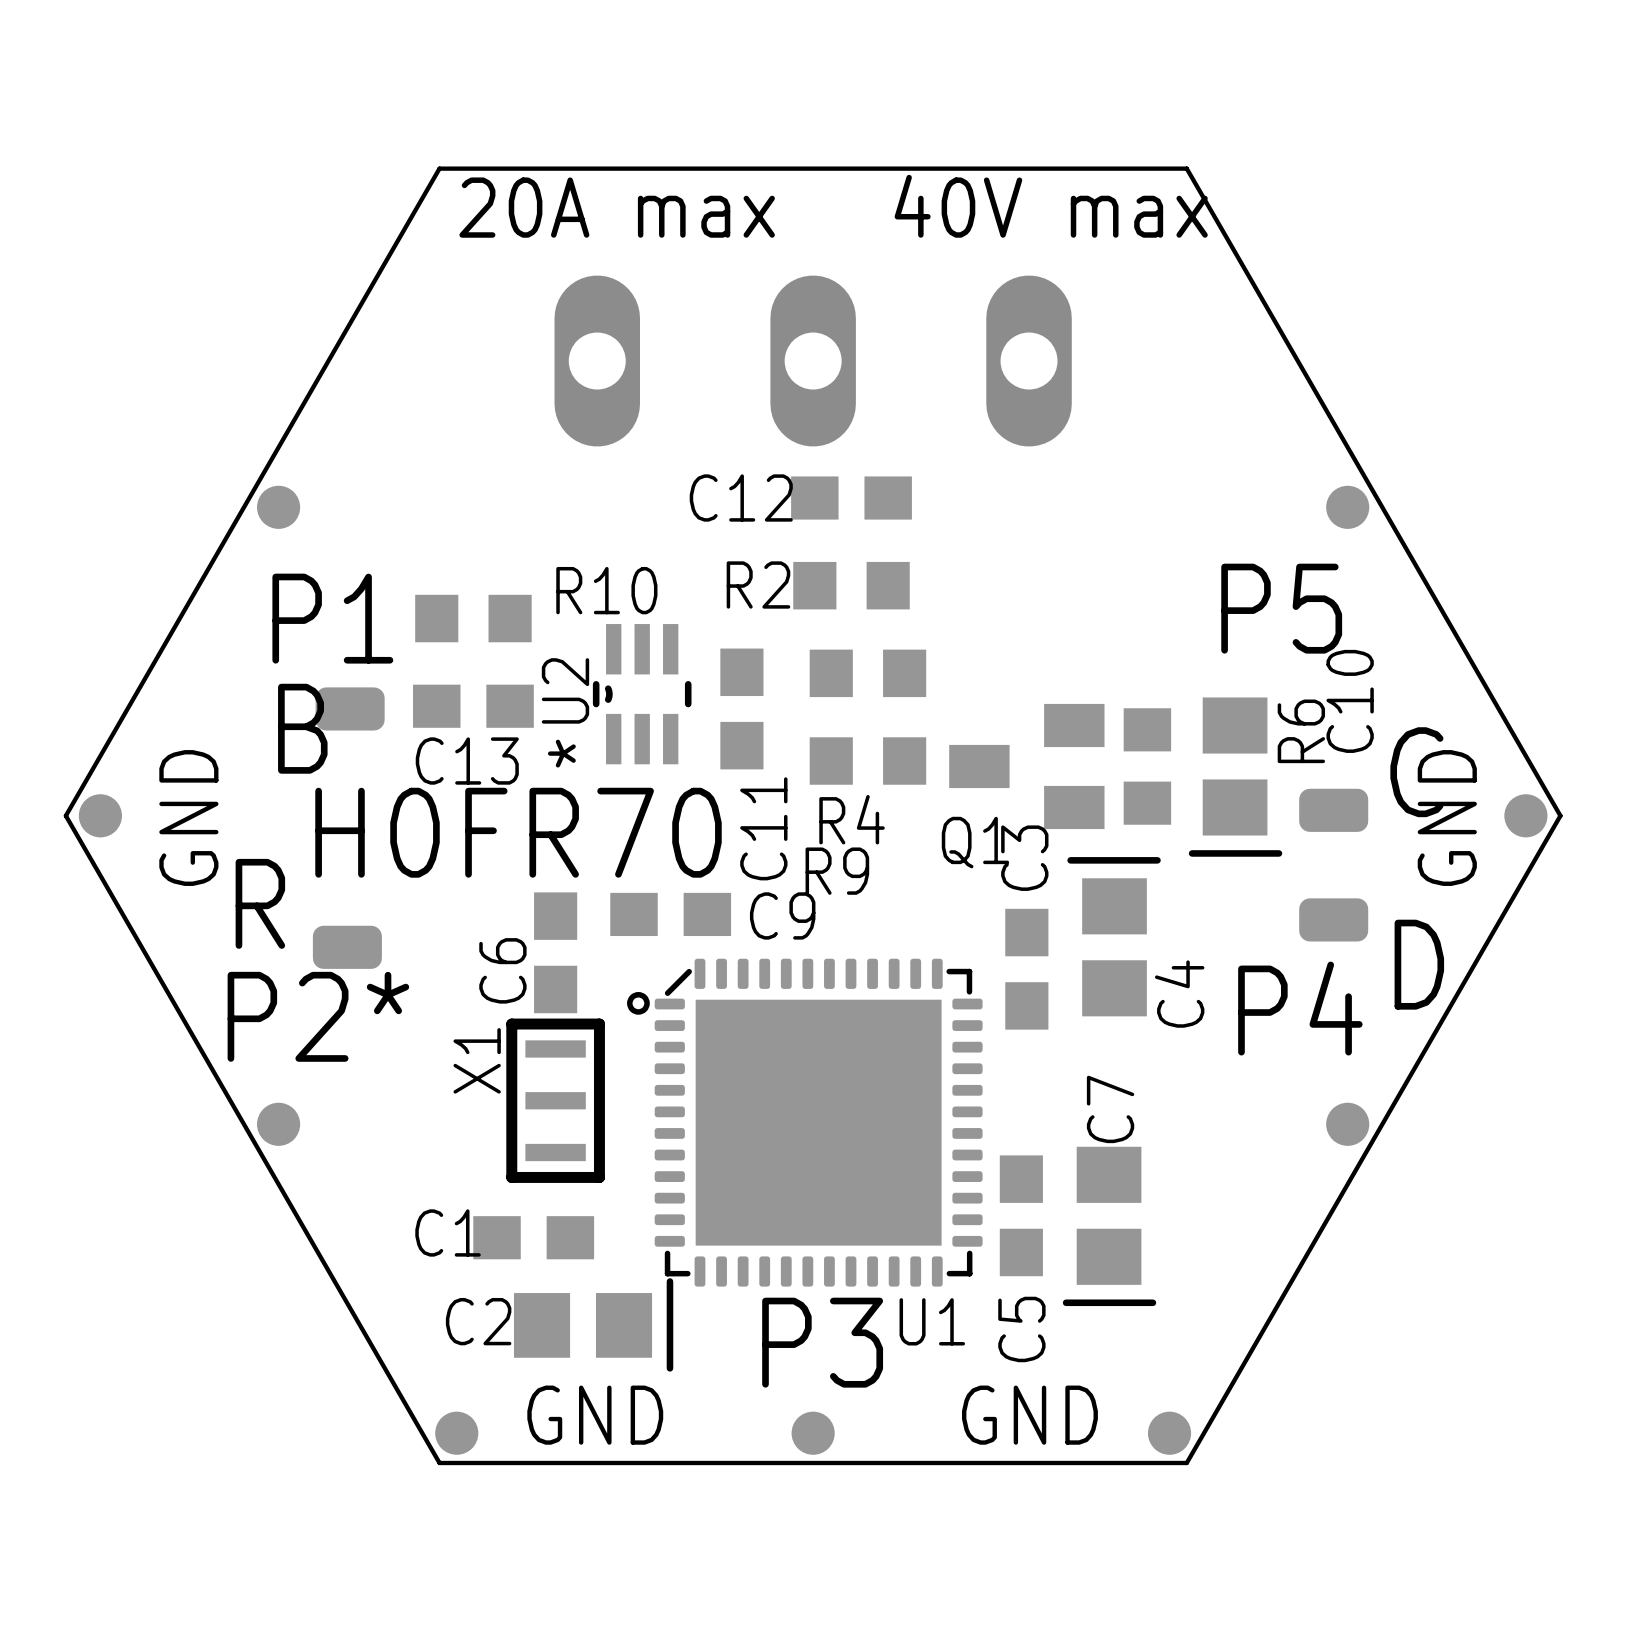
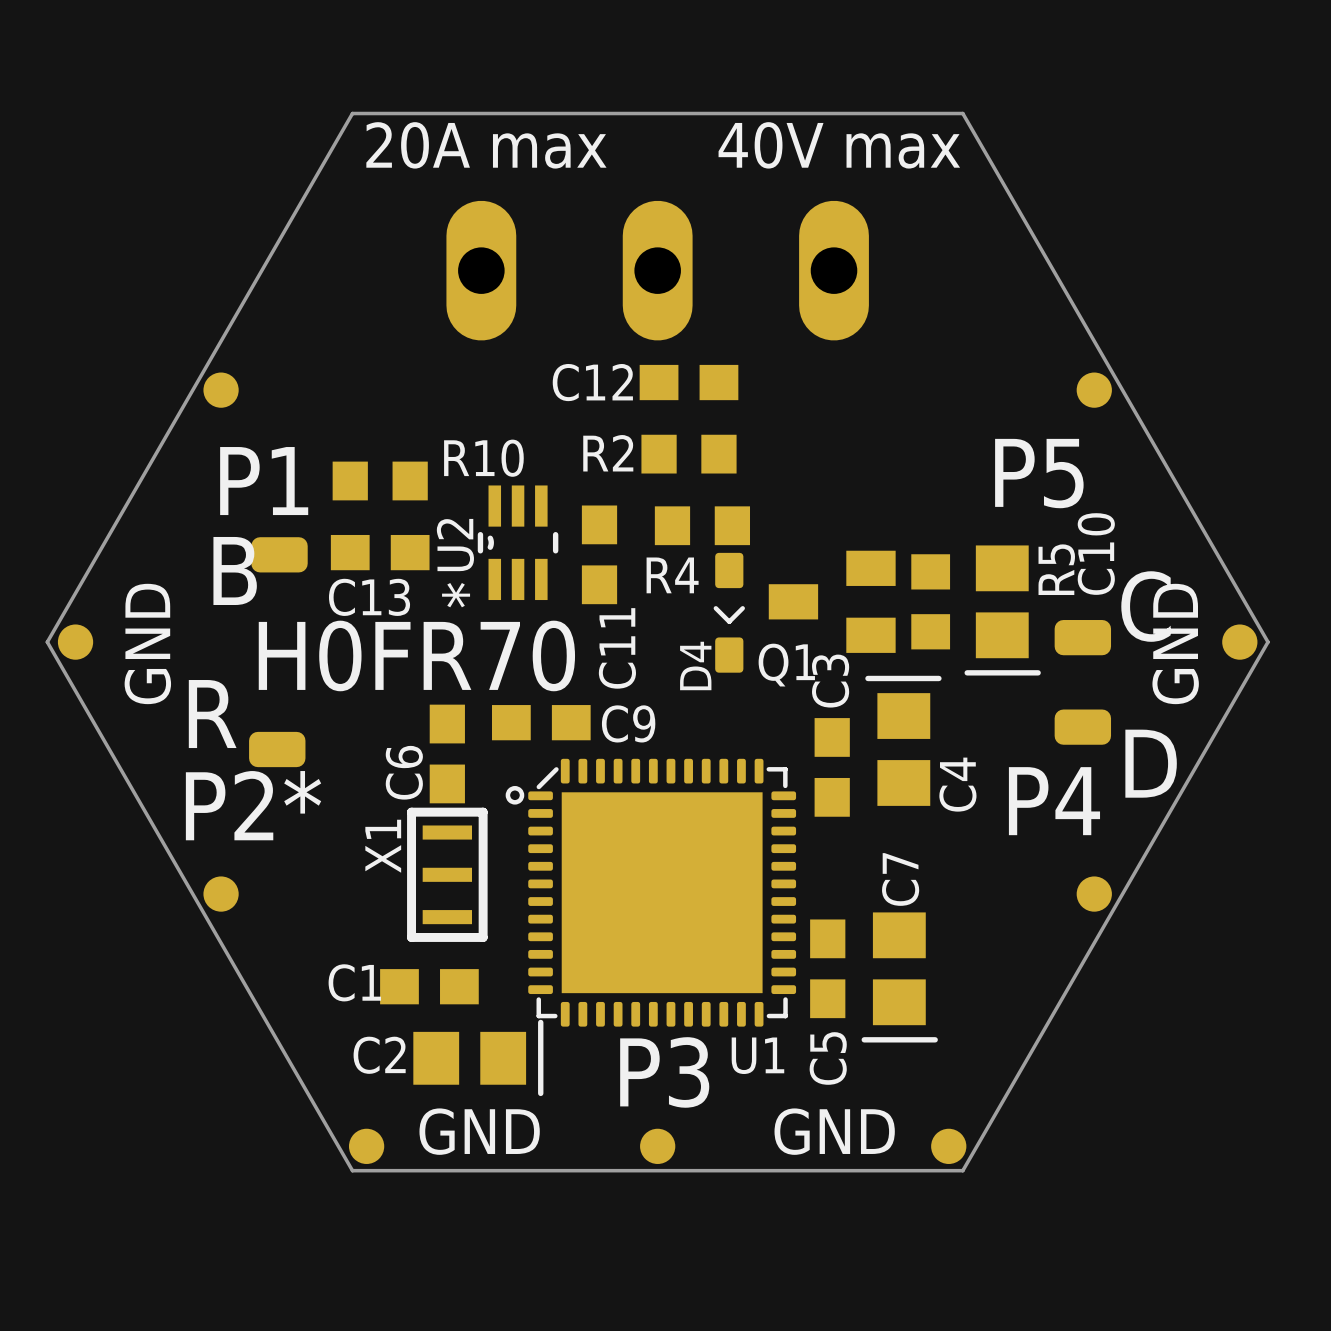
R6 name: R6 (1301, 731) -> R5 (1056, 569)
R9: (867, 761) -> none
D4: none -> (729, 612)
R4 name position: R4 (852, 819) -> R4 (672, 575)

